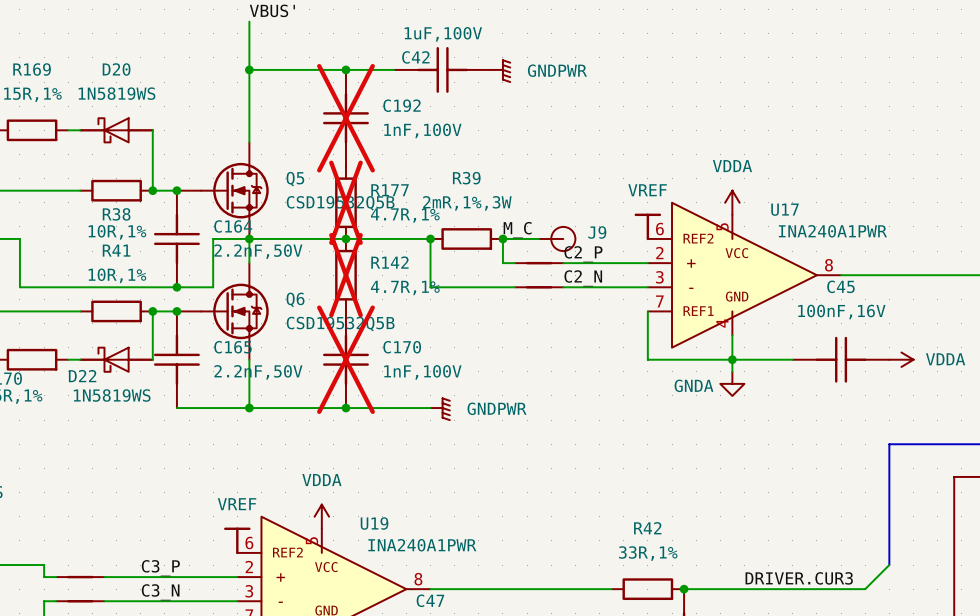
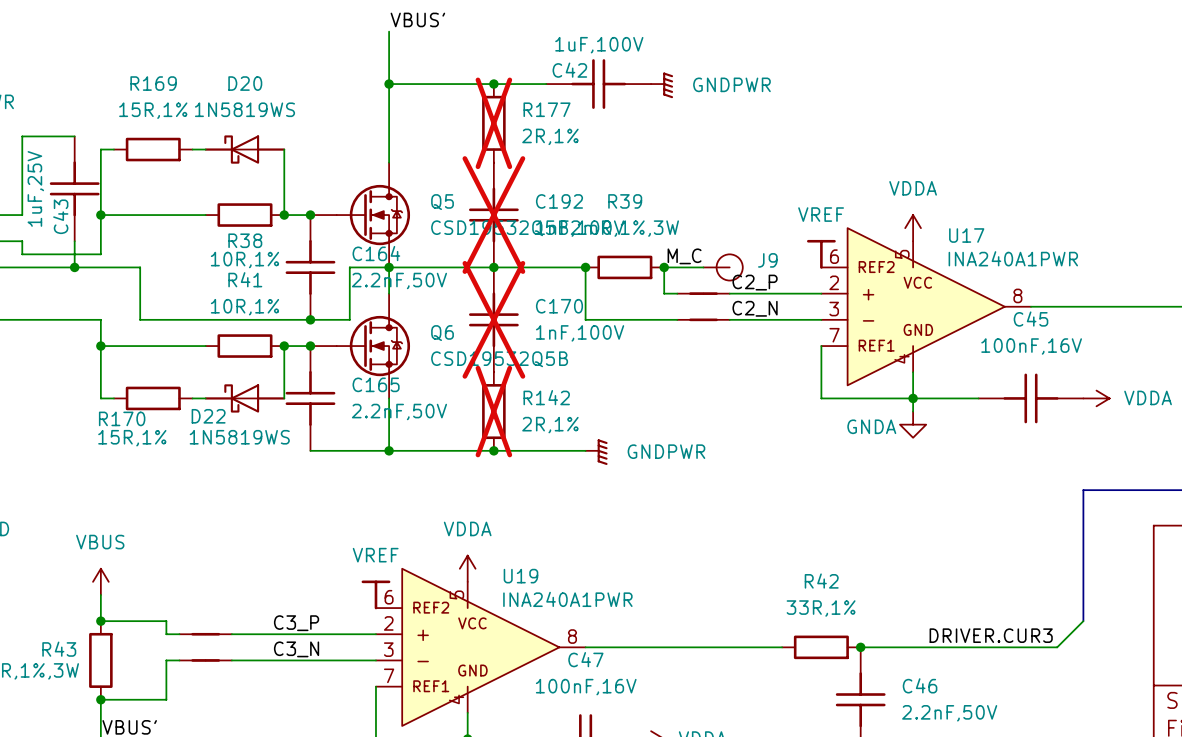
C192 position: (345, 118) -> (493, 215)
R177 position: (345, 202) -> (493, 123)
R177 value: 4.7R,1% (405, 215) -> 2R,1% (550, 136)
R142 position: (345, 275) -> (493, 411)
R142 value: 4.7R,1% (405, 287) -> 2R,1% (550, 425)
C170 position: (345, 359) -> (493, 319)

